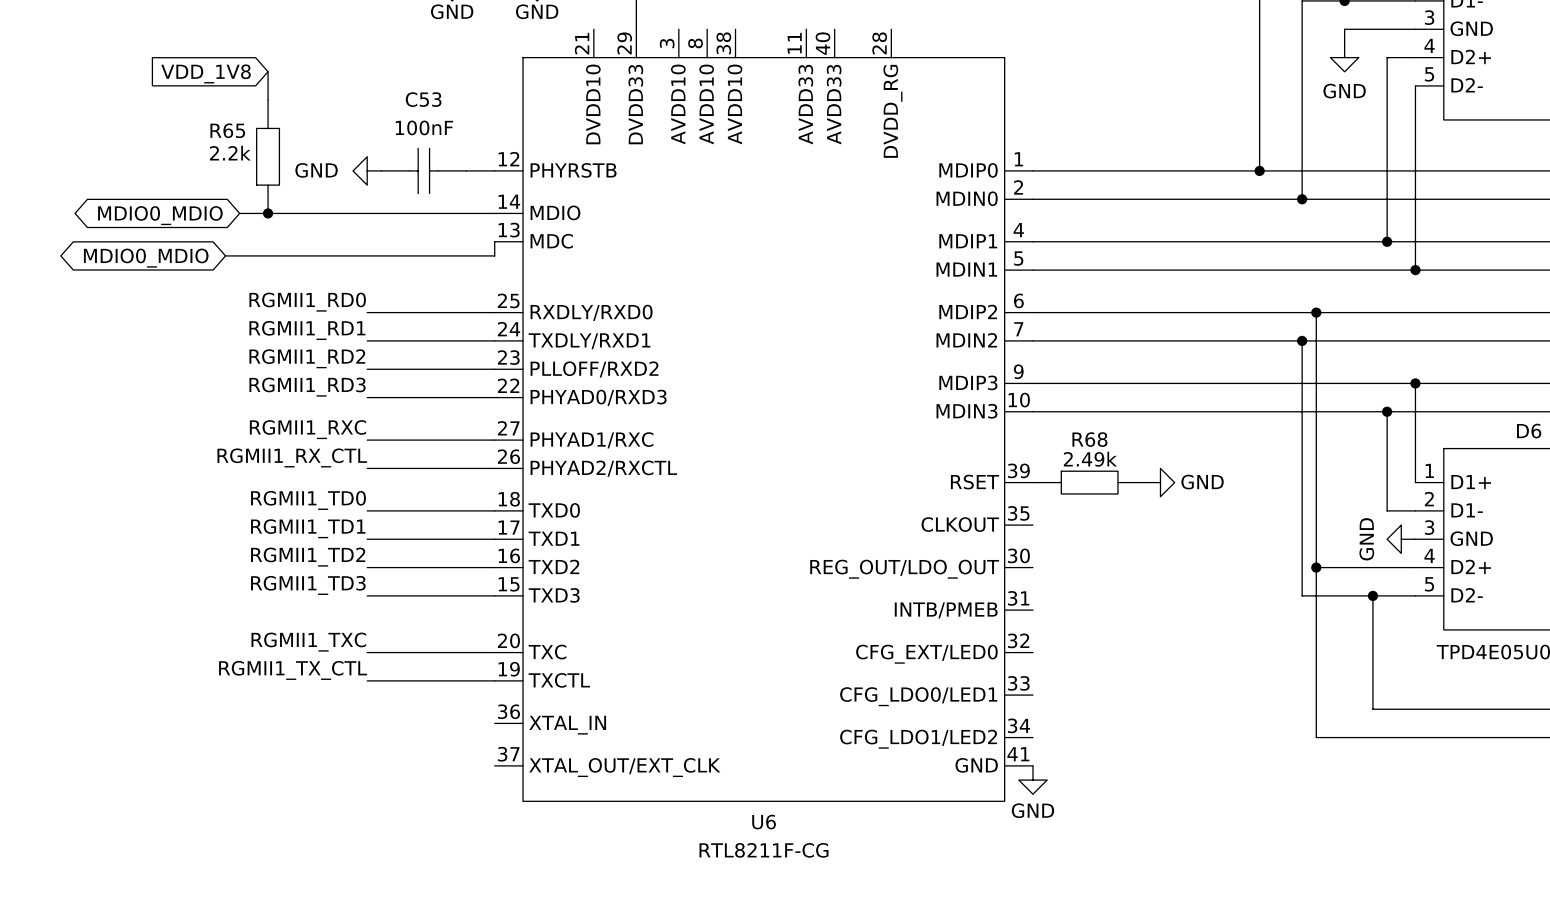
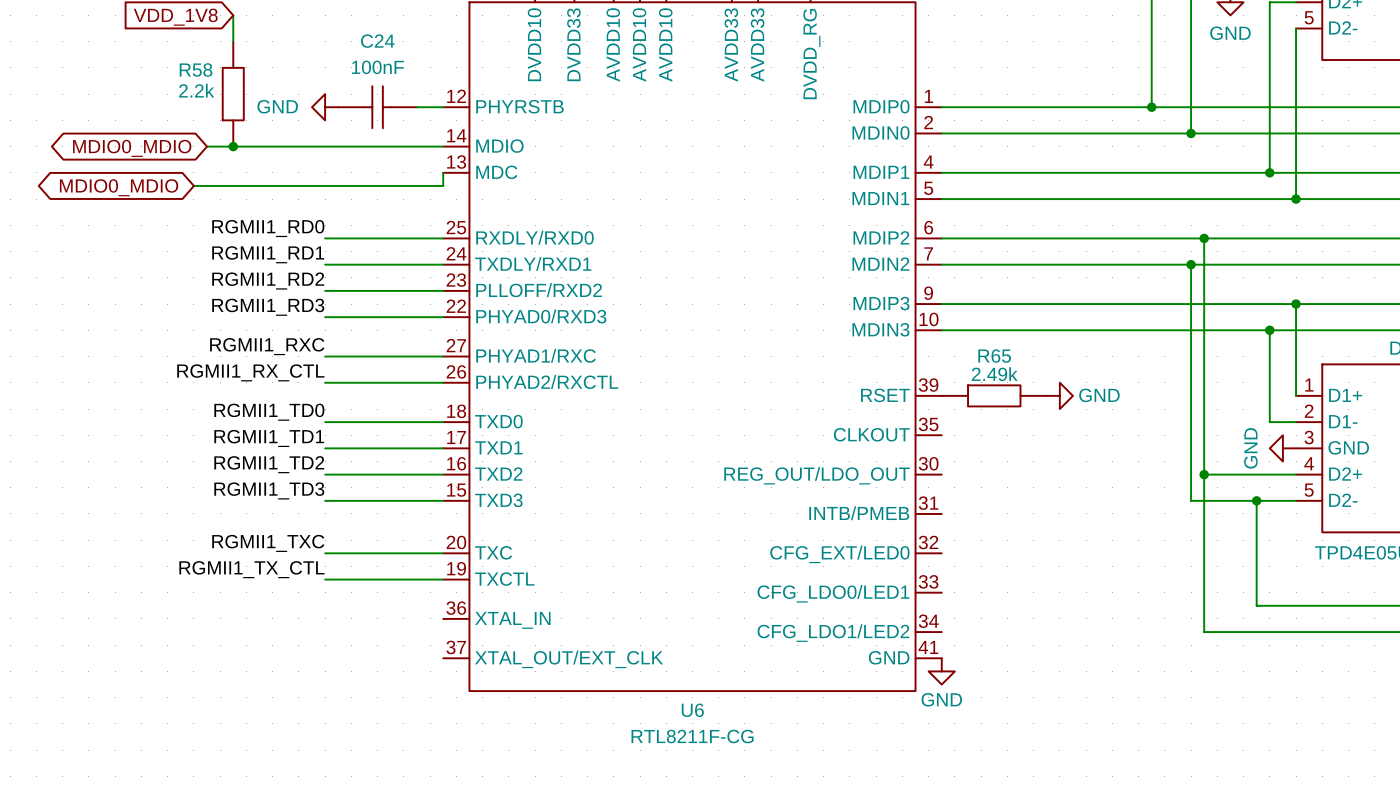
C53 name: C53 (423, 99) -> C24 (377, 41)
R65 name: R65 (227, 130) -> R58 (196, 70)
R68 name: R68 (1089, 439) -> R65 (994, 356)

